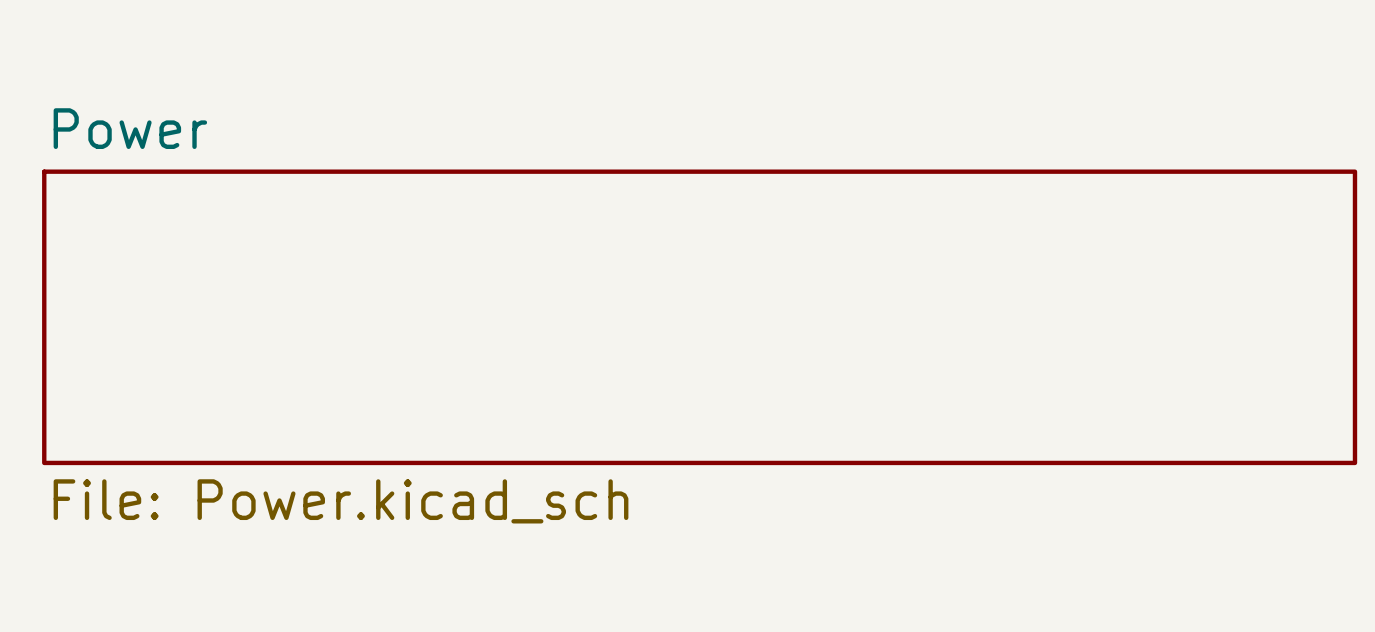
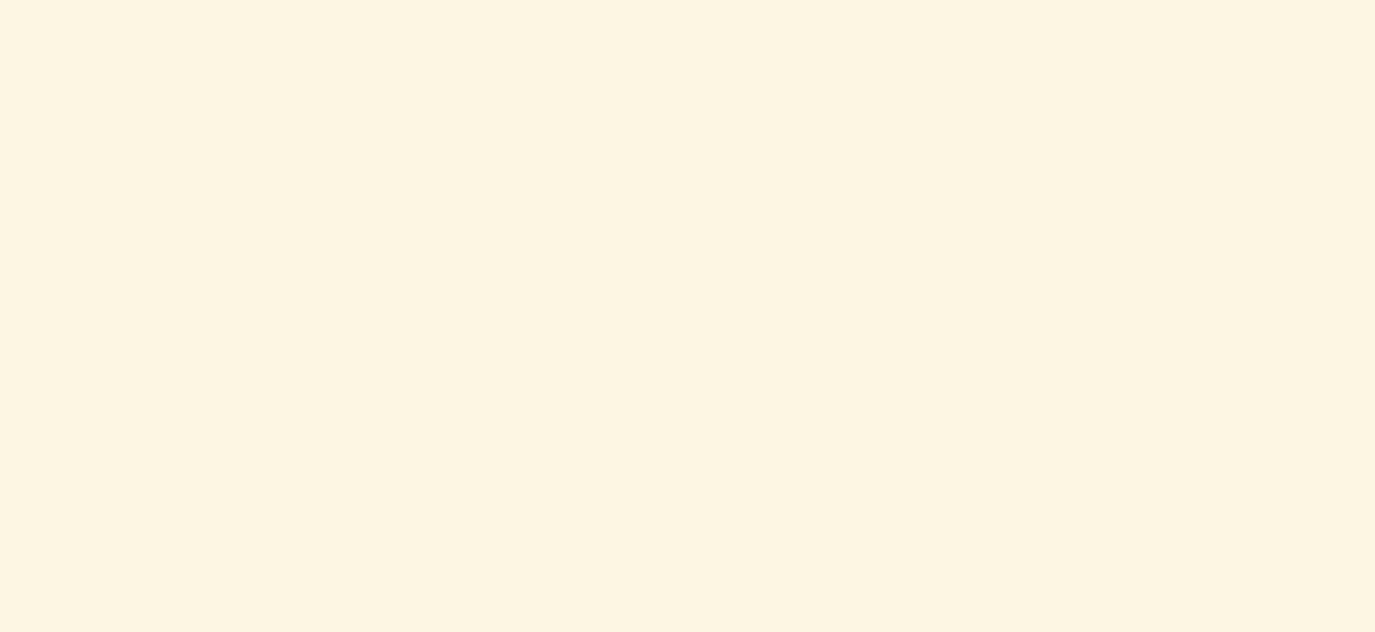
sheet Power: File: Power.kicad_sch (699, 317) -> none

